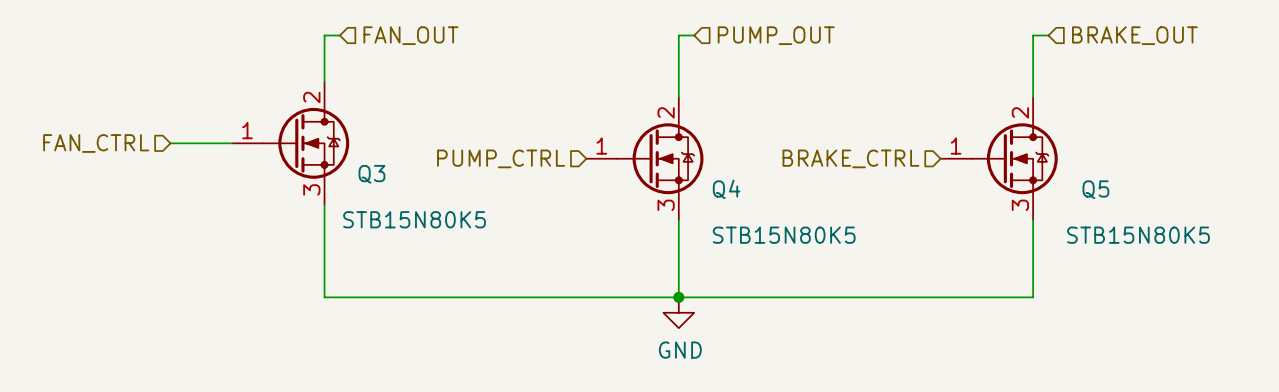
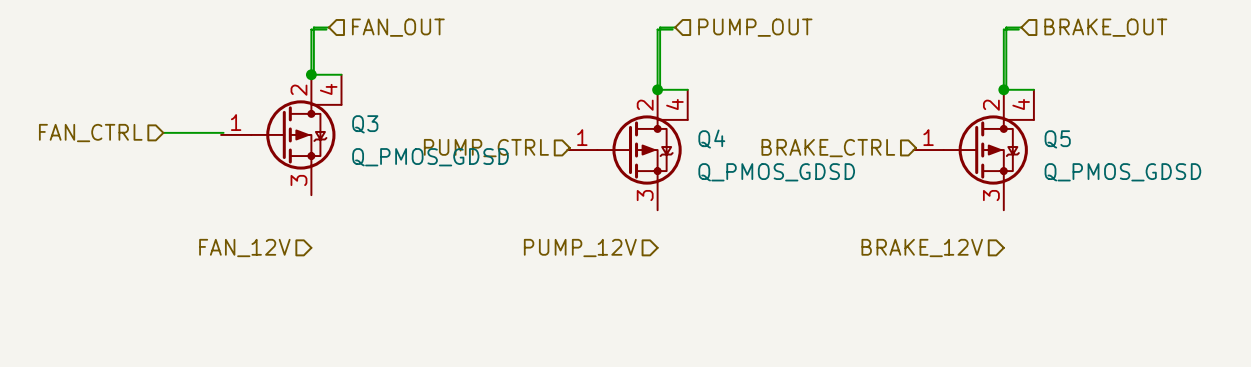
wire: none -> (326, 29) (311, 29) (311, 74) (341, 74)
wire: none -> (672, 29) (657, 29) (657, 89) (687, 89)
wire: none -> (1018, 29) (1003, 29) (1003, 89) (1033, 89)
Q3 symbol: [232, 81, 350, 205] -> [221, 74, 342, 196]
junction: none -> (311, 74)
Q4 symbol: [586, 97, 704, 221] -> [567, 89, 688, 211]
Q5 symbol: [940, 97, 1058, 221] -> [913, 89, 1034, 211]
junction: none -> (657, 89)
junction: none -> (1003, 89)
Q3 name position: Q3 (371, 174) -> Q3 (365, 124)
Q4 name position: Q4 (726, 189) -> Q4 (711, 139)
Q5 name position: Q5 (1095, 189) -> Q5 (1057, 139)
wire: (324, 204) (324, 297) (1033, 297) (1033, 220) -> none
Q3 value: STB15N80K5 (414, 219) -> Q_PMOS_GDSD (430, 157)
wire: (678, 220) (678, 297) -> none
Q4 value: STB15N80K5 (784, 235) -> Q_PMOS_GDSD (776, 172)
Q5 value: STB15N80K5 (1138, 235) -> Q_PMOS_GDSD (1122, 172)
hierarchical label: none -> FAN_12V (244, 248)
hierarchical label: none -> PUMP_12V (580, 248)
hierarchical label: none -> BRAKE_12V (922, 248)
junction: (678, 297) -> none
power symbol: GND (678, 312) -> none

